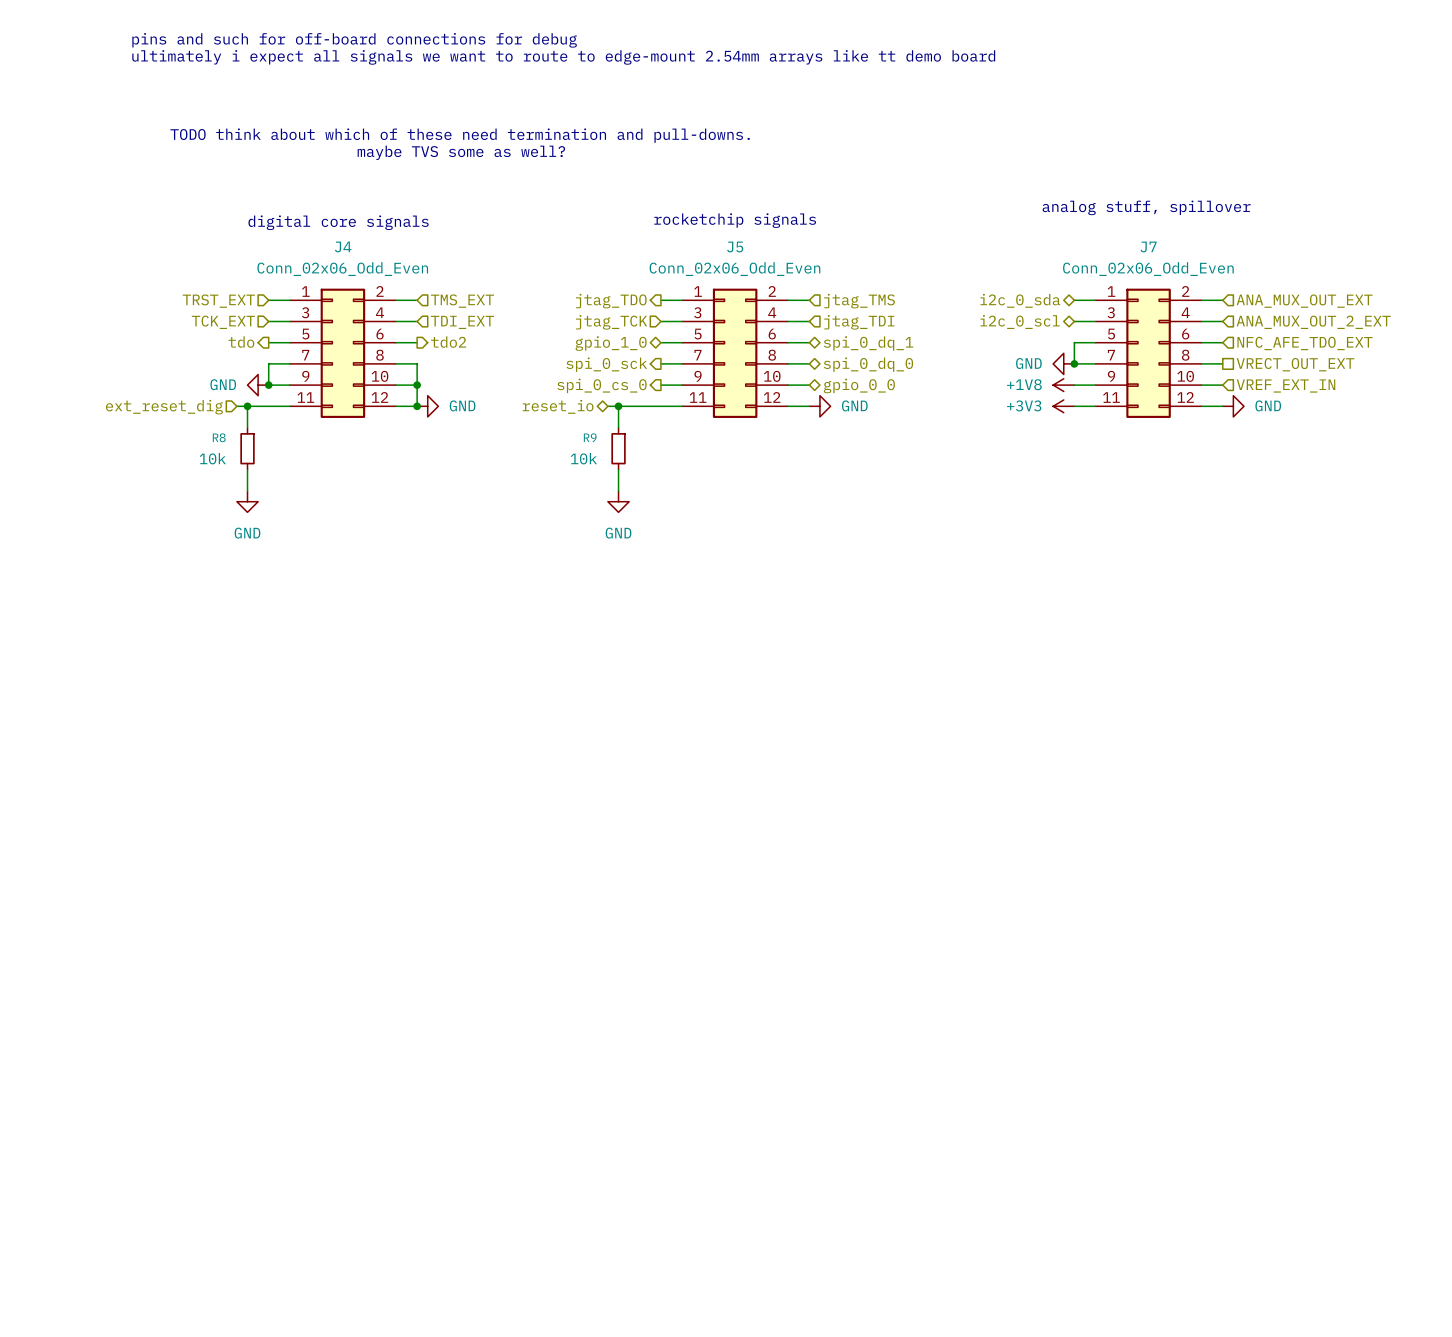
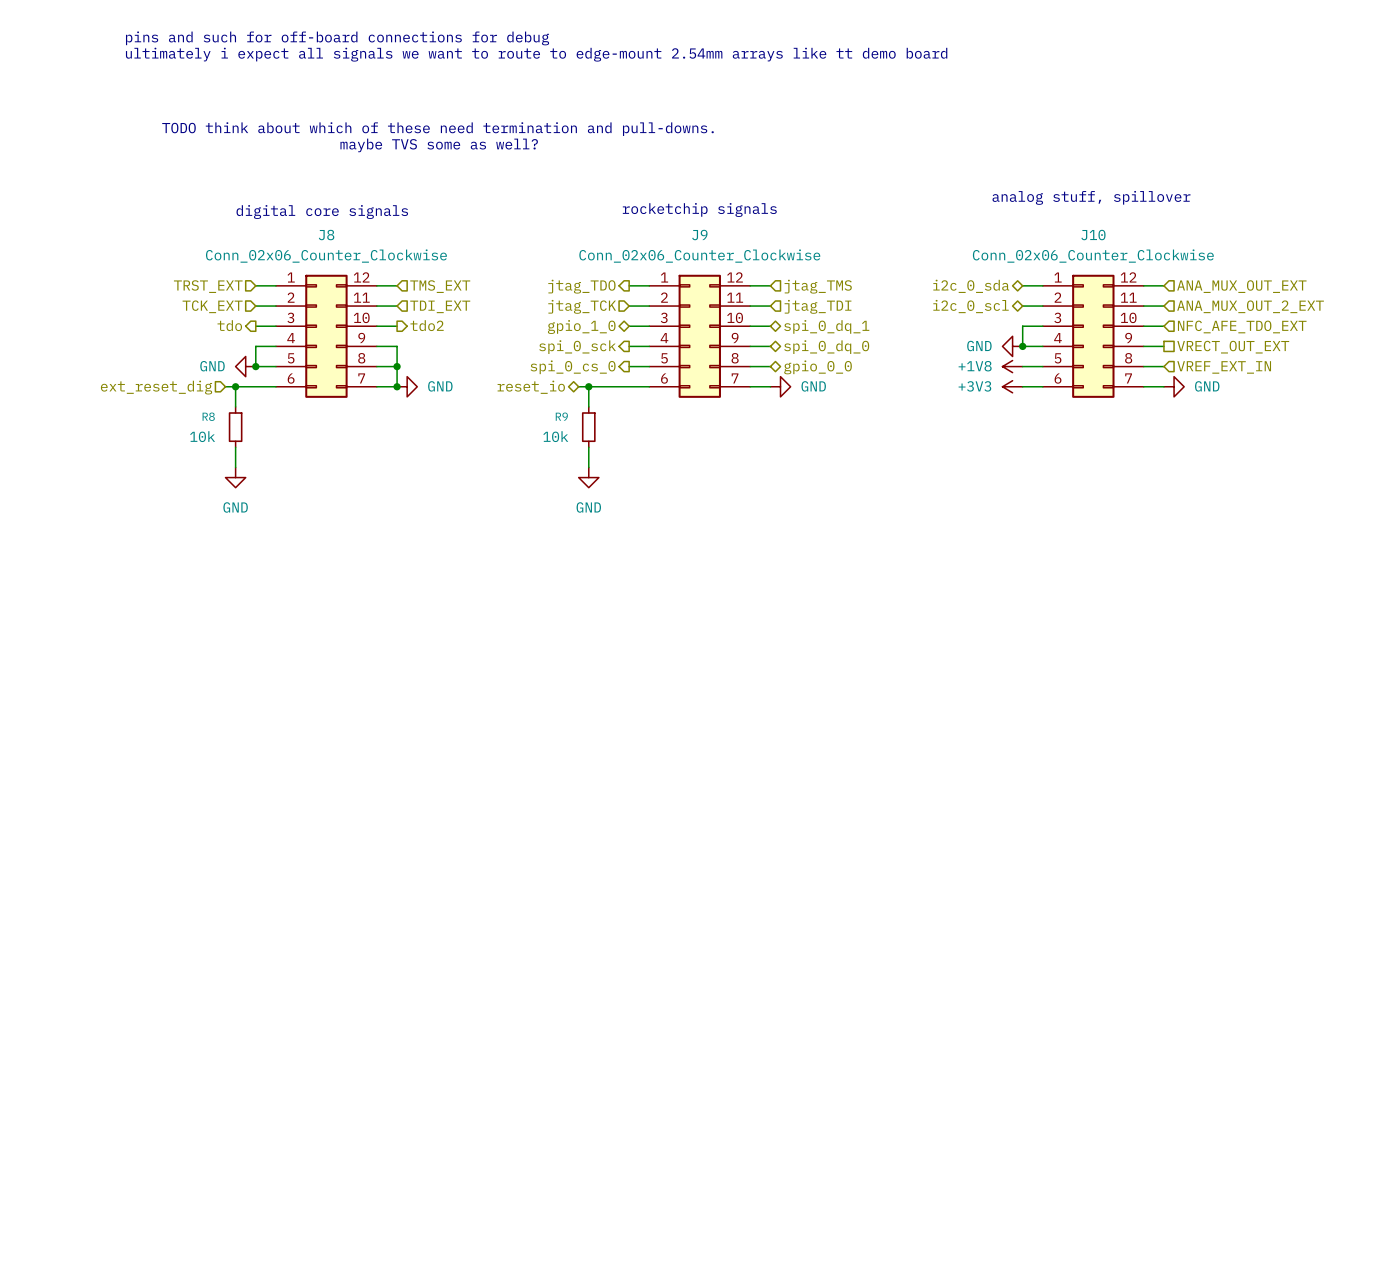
J4 name: J4 (343, 246) -> J8 (326, 235)
J5 name: J5 (735, 246) -> J9 (699, 235)
J7 name: J7 (1148, 246) -> J10 (1093, 235)
J4 value: Conn_02x06_Odd_Even (342, 269) -> Conn_02x06_Counter_Clockwise (326, 256)
J5 value: Conn_02x06_Odd_Even (734, 269) -> Conn_02x06_Counter_Clockwise (699, 256)
J7 value: Conn_02x06_Odd_Even (1148, 269) -> Conn_02x06_Counter_Clockwise (1093, 256)
J4 symbol: [289, 288, 396, 418] -> [275, 274, 377, 398]
J5 symbol: [682, 288, 789, 418] -> [649, 274, 751, 398]
J7 symbol: [1095, 288, 1202, 418] -> [1042, 274, 1144, 398]

